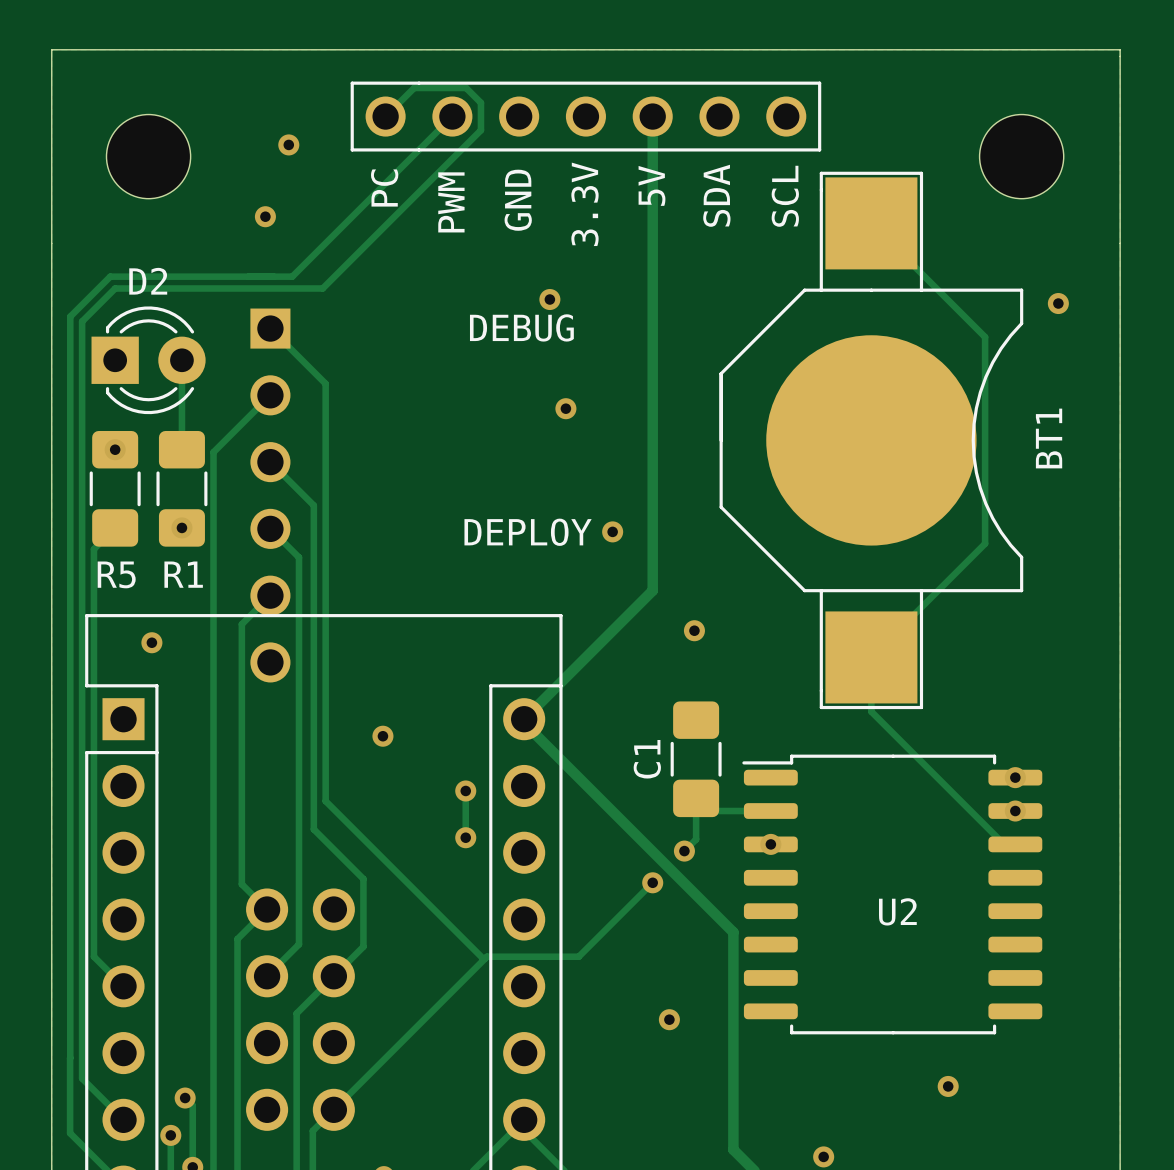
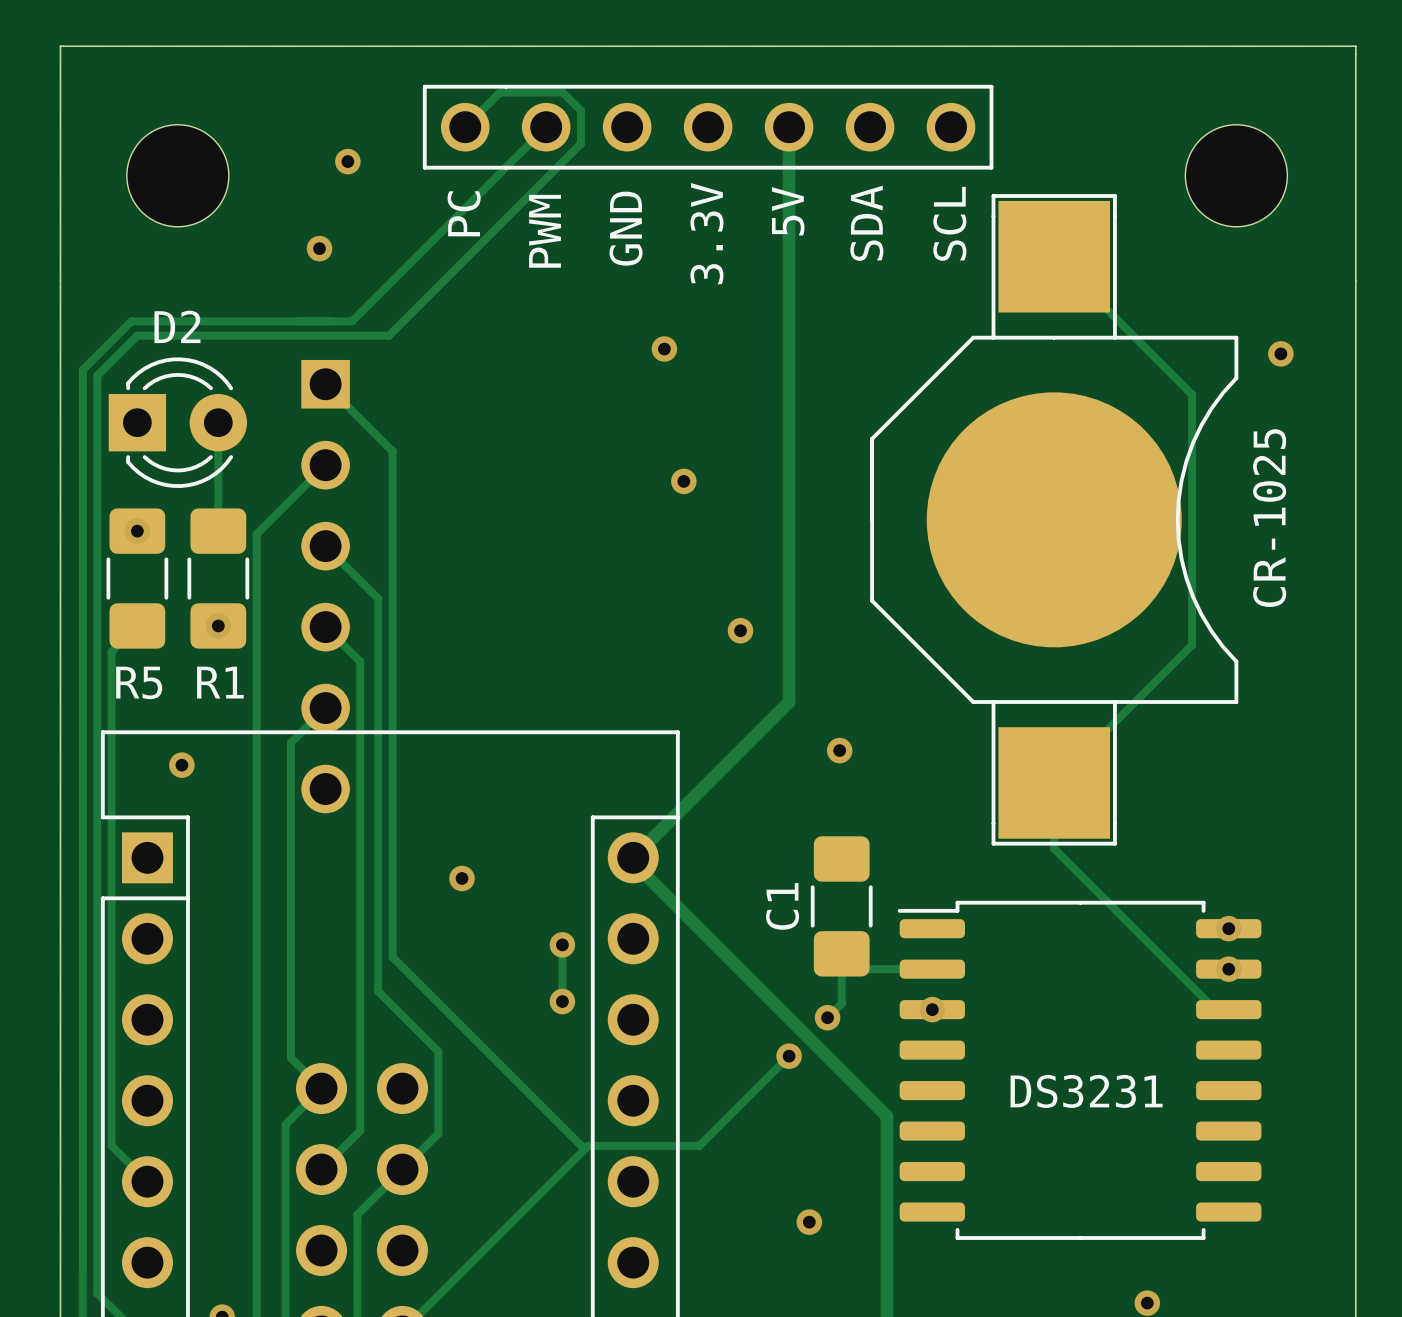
text: DEBUG (521, 327) -> none
BT1 name: BT1 (1049, 438) -> CR-1025 (1269, 518)
text: DEPLOY (528, 532) -> none
U2 name: U2 (897, 911) -> DS3231 (1086, 1091)

